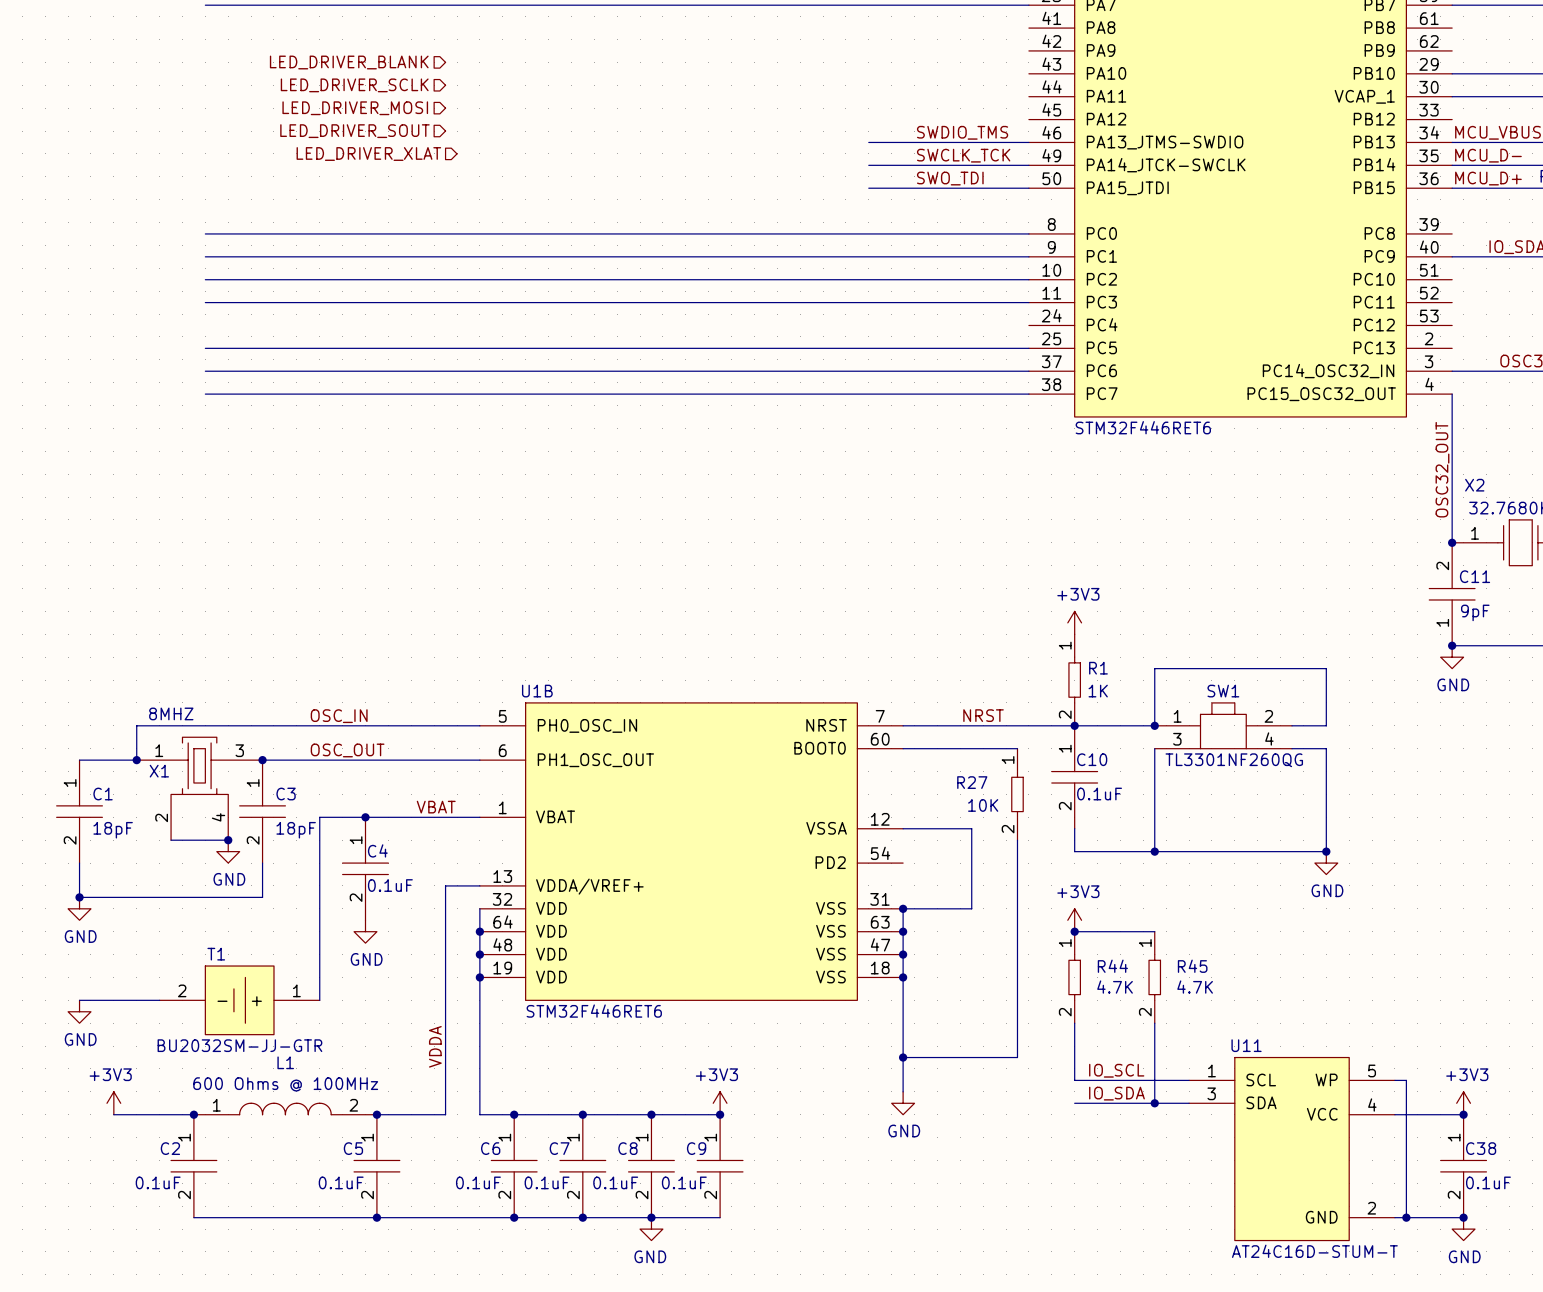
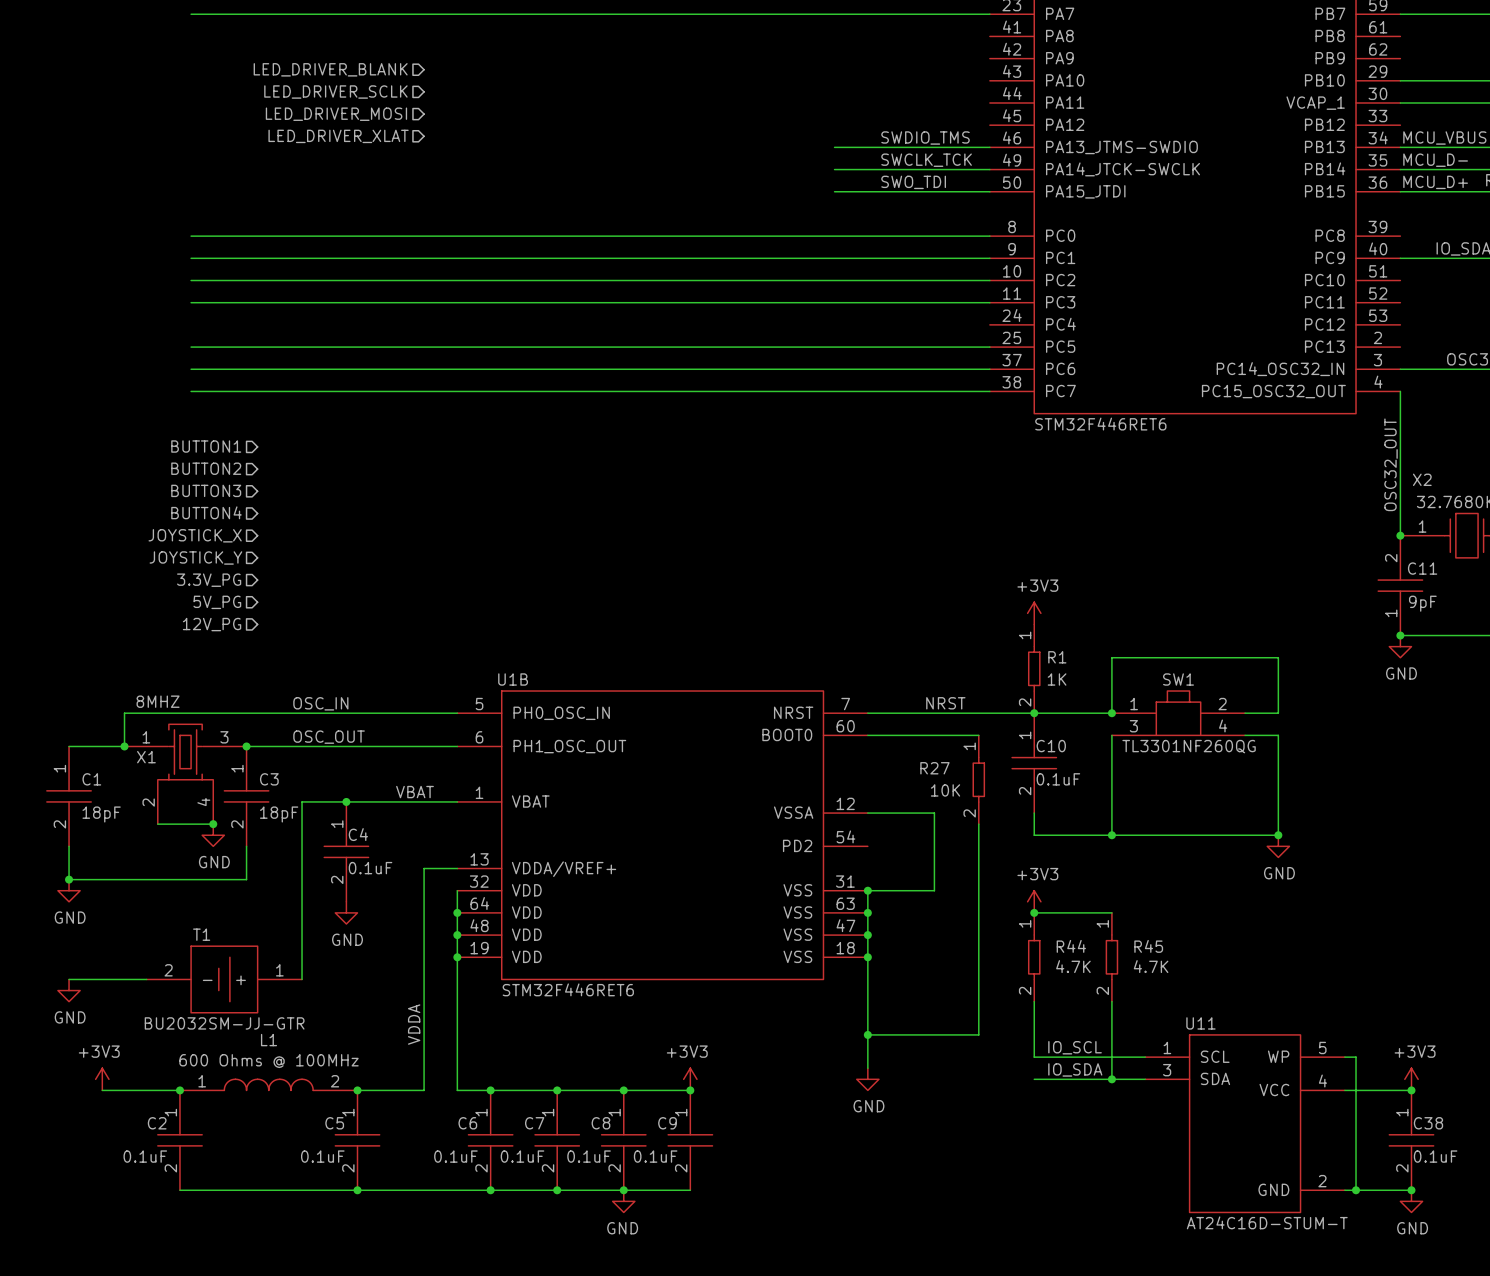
hierarchical label: LED_DRIVER_SOUT (354, 131) -> LED_DRIVER_XLAT (338, 136)
hierarchical label: LED_DRIVER_XLAT (368, 154) -> none
hierarchical label: none -> BUTTON1 (206, 446)
hierarchical label: none -> BUTTON2 (206, 468)
hierarchical label: none -> BUTTON3 (206, 490)
hierarchical label: none -> BUTTON4 (206, 512)
hierarchical label: none -> JOYSTICK_X (195, 535)
hierarchical label: none -> JOYSTICK_Y (195, 557)
hierarchical label: none -> 3.3V_PG (209, 580)
hierarchical label: none -> 5V_PG (217, 602)
hierarchical label: none -> 12V_PG (212, 624)

